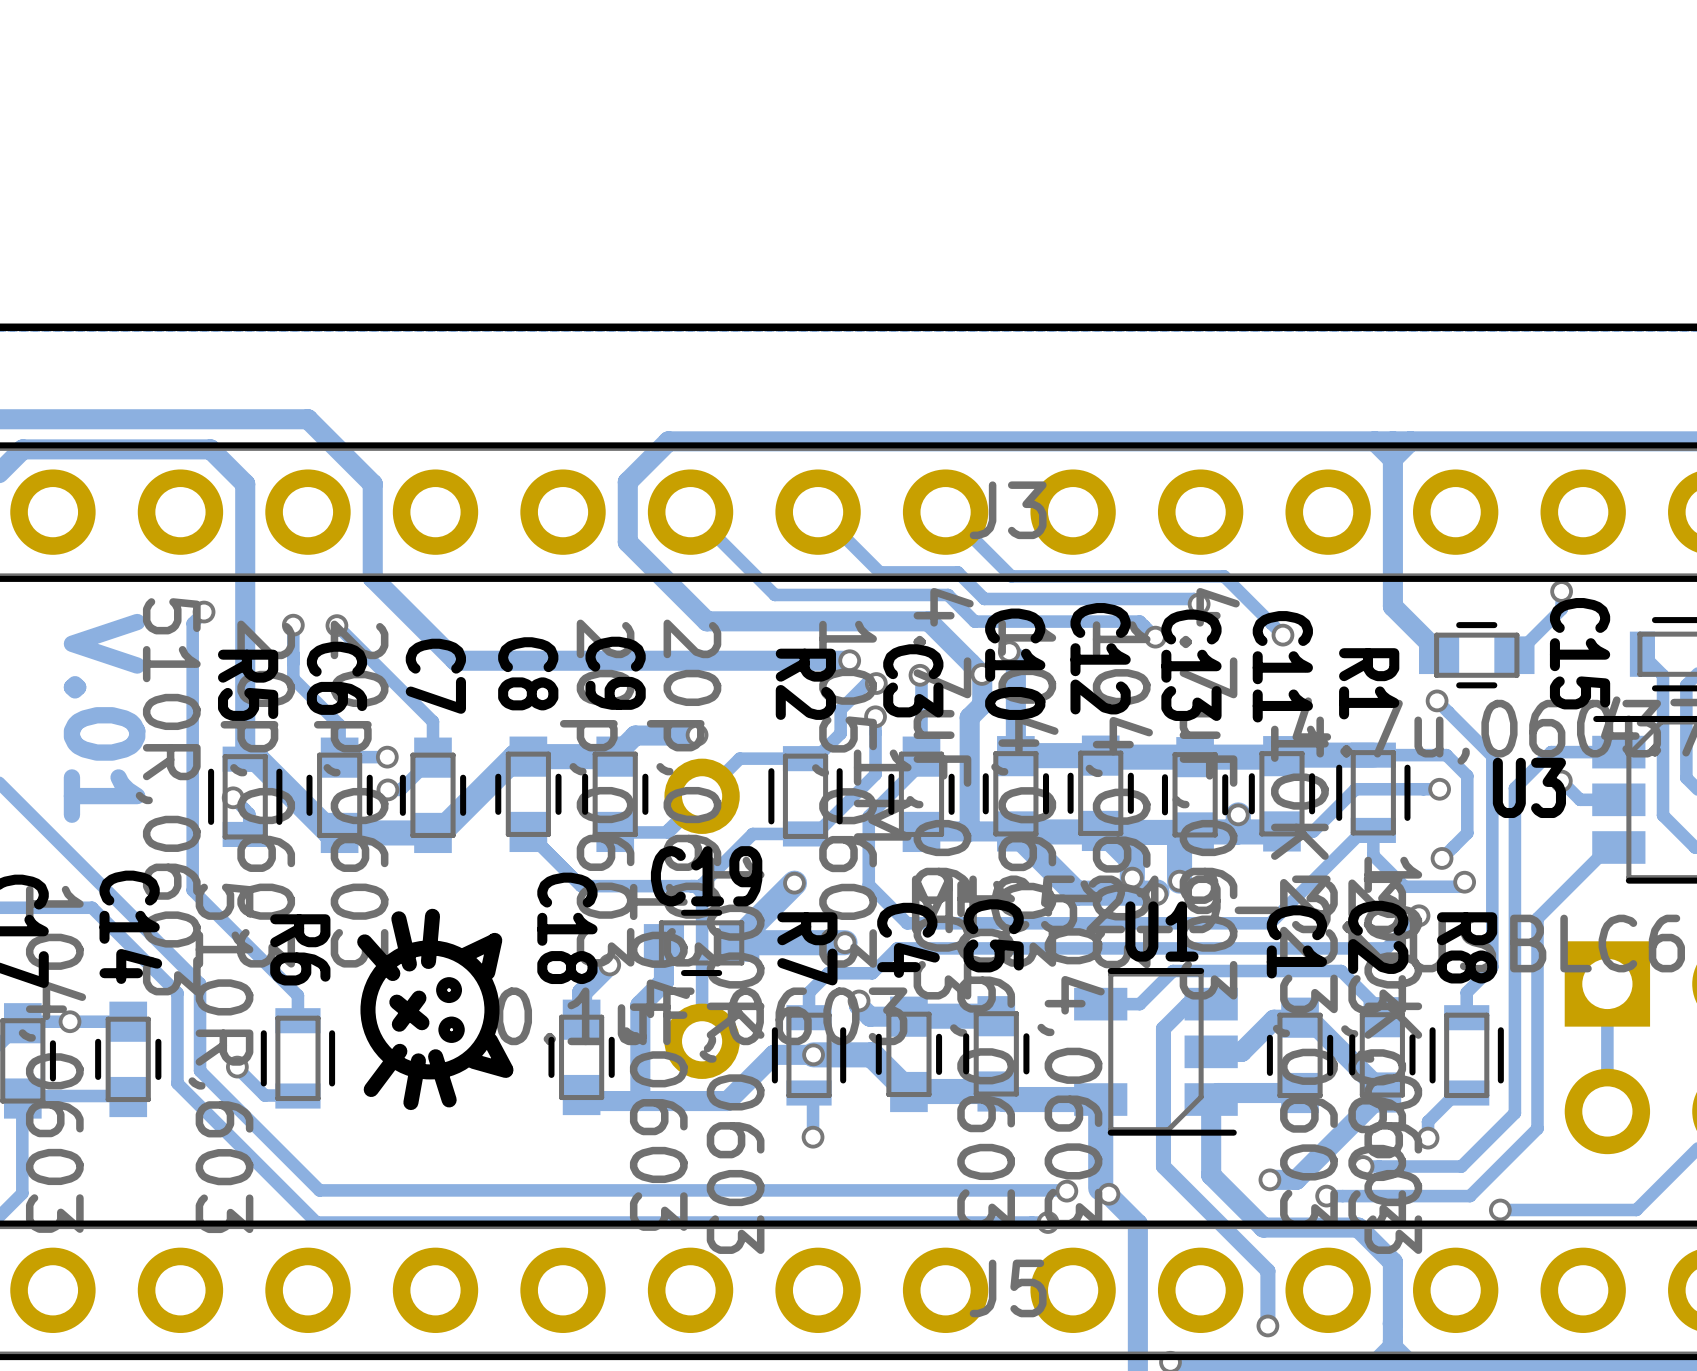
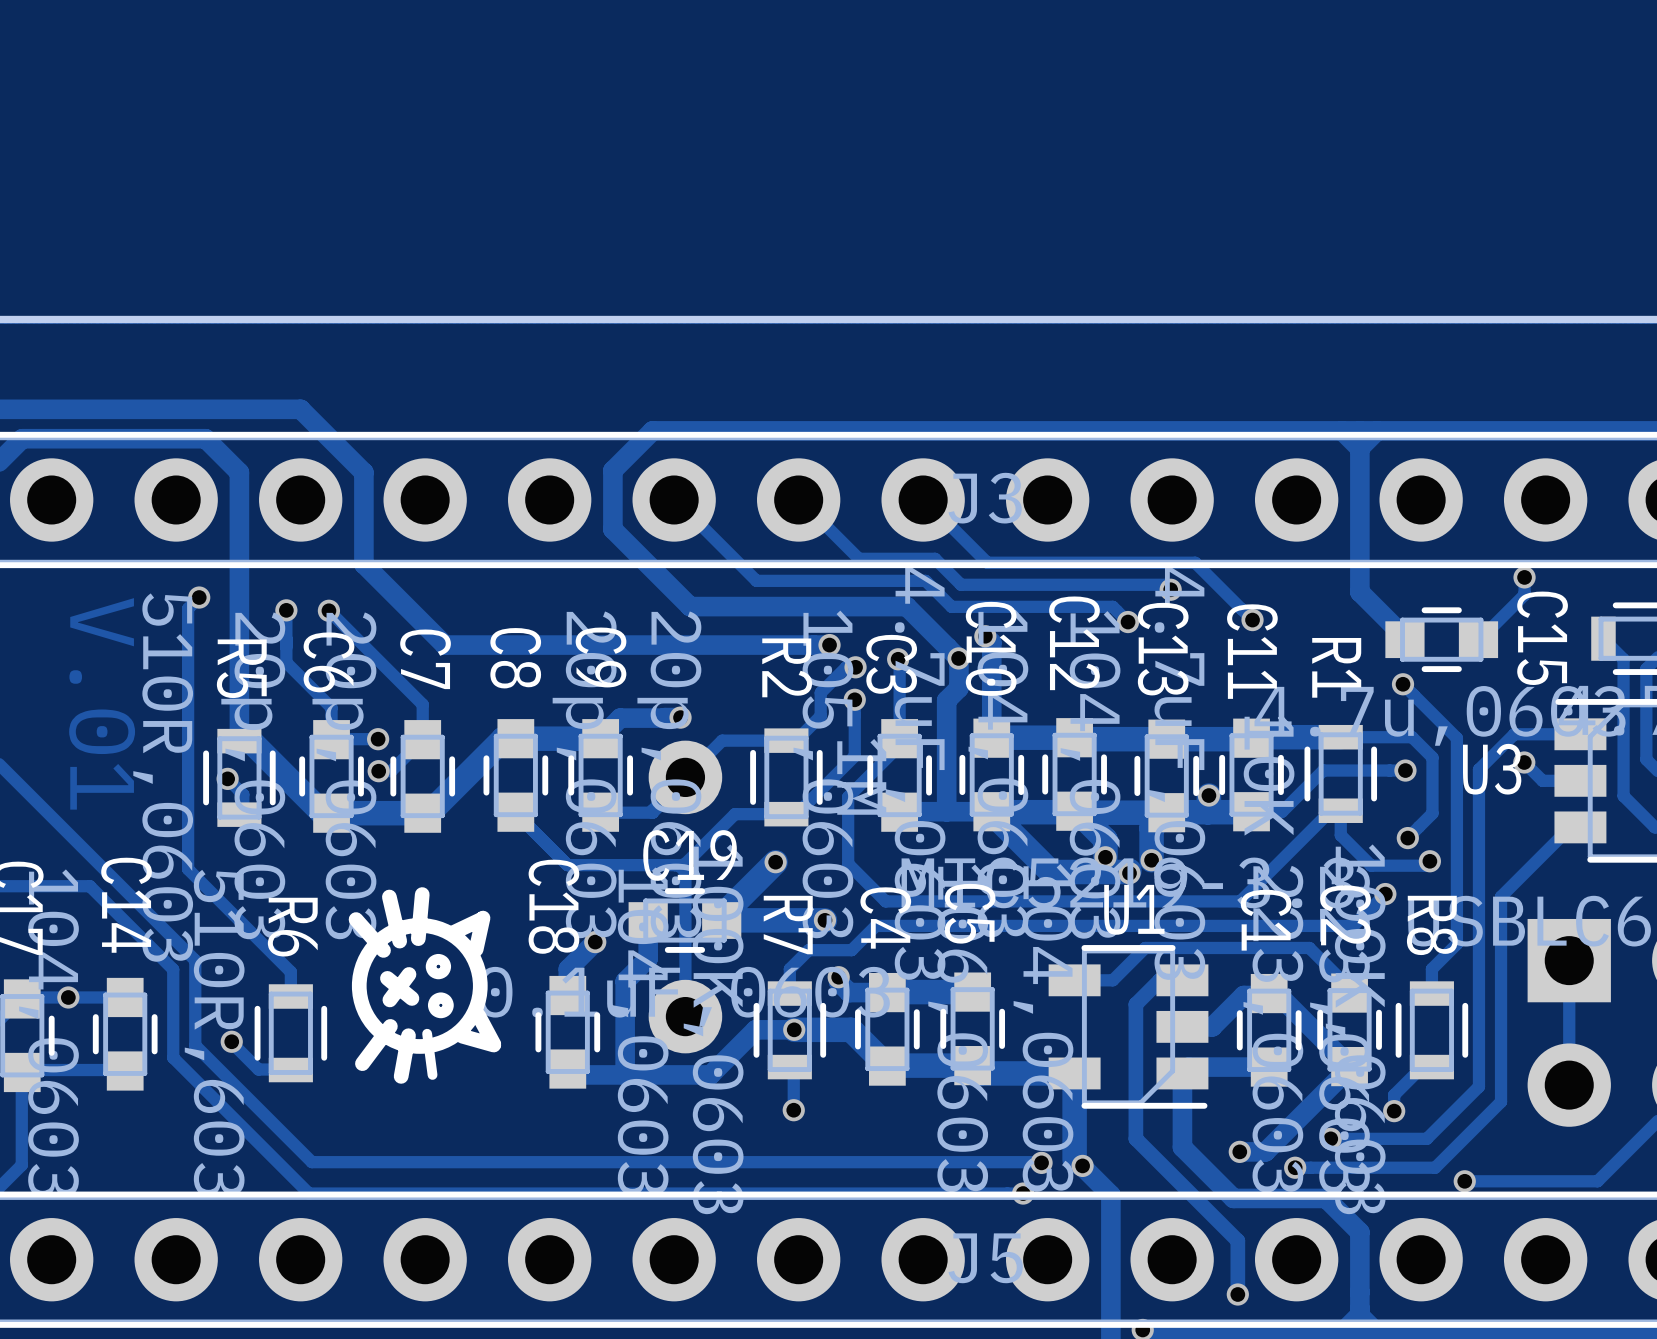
line: (435, 1056) (449, 1099) -> none
line: none -> (427, 1033) (432, 1074)

